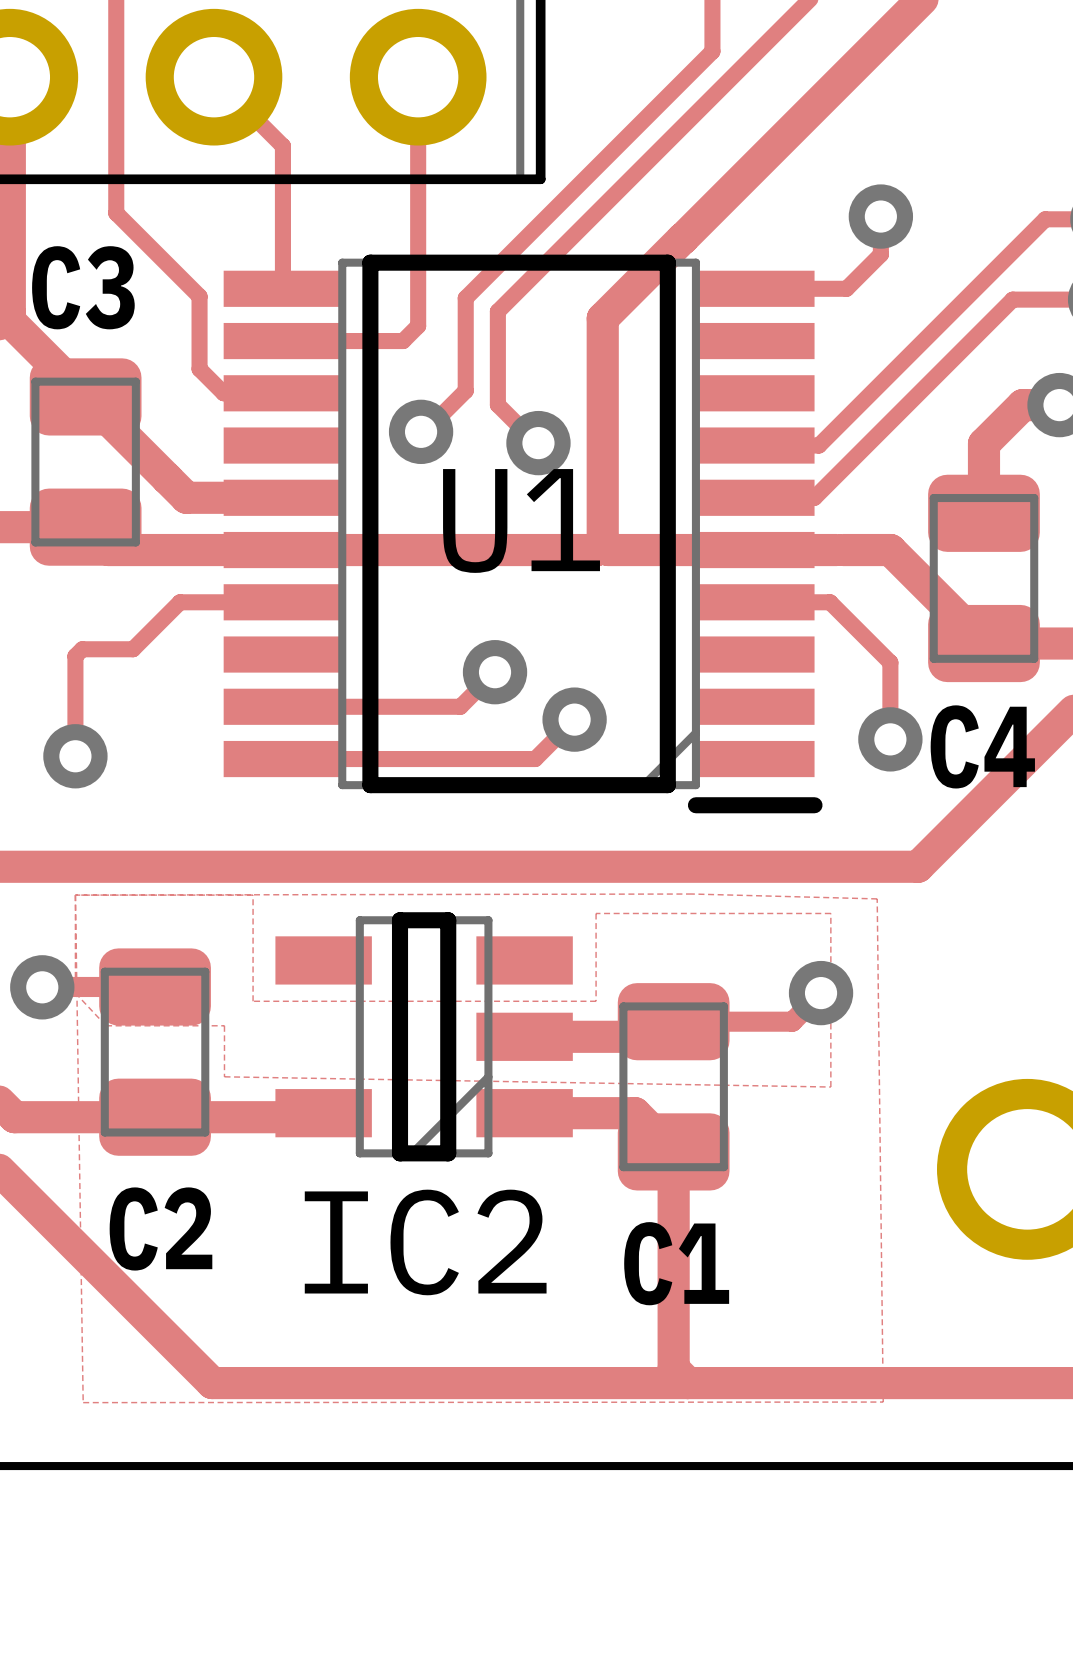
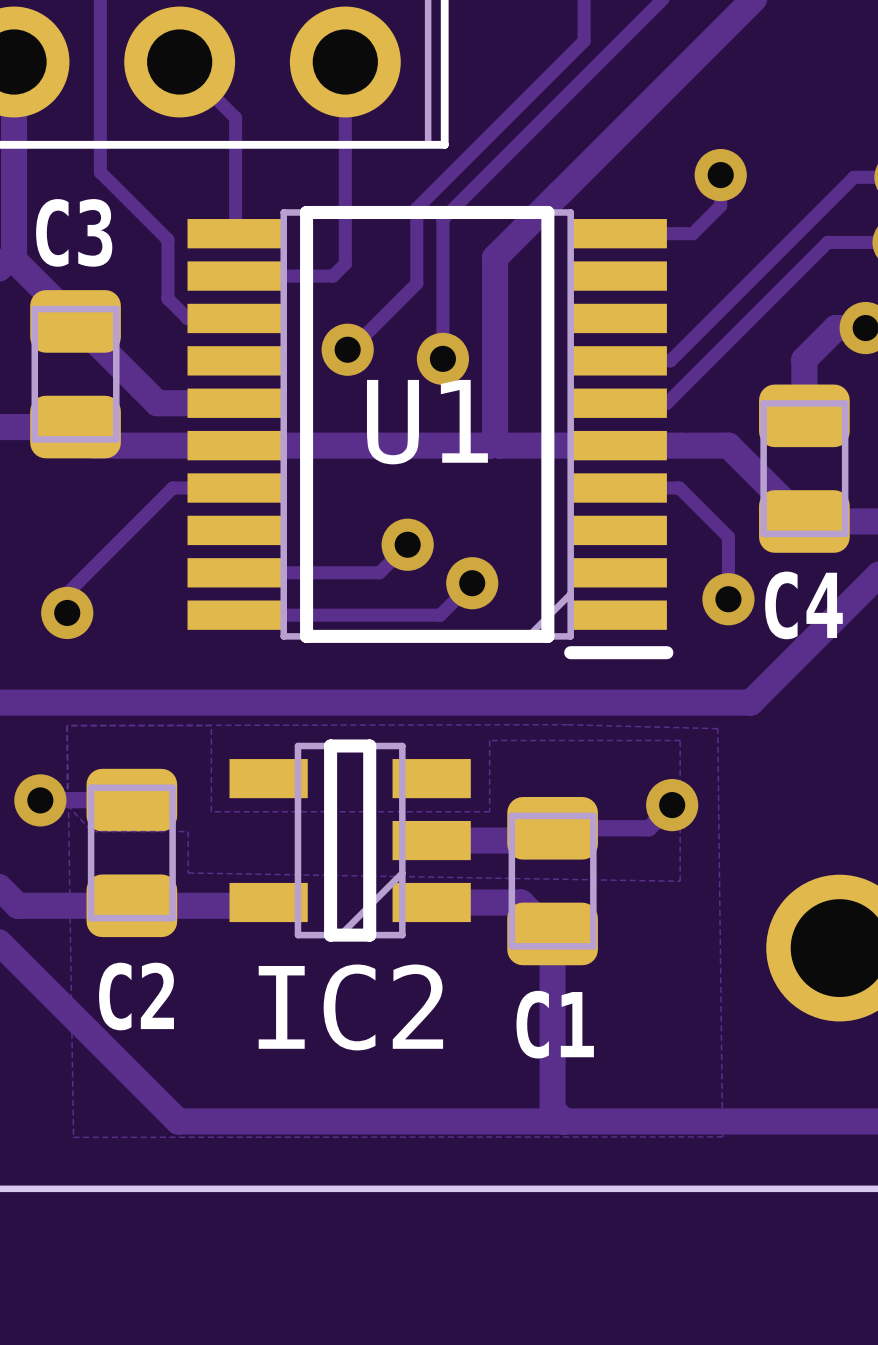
track: (506, 257) (465, 298) (465, 390) -> (416, 208) (416, 283) (383, 316)
track: (538, 270) (497, 311) (497, 404) (536, 443) (538, 443) -> (442, 219) (442, 358)
track: (205, 602) (180, 602) (133, 649) (82, 649) (75, 656) (75, 732) -> (172, 488) (67, 593)

